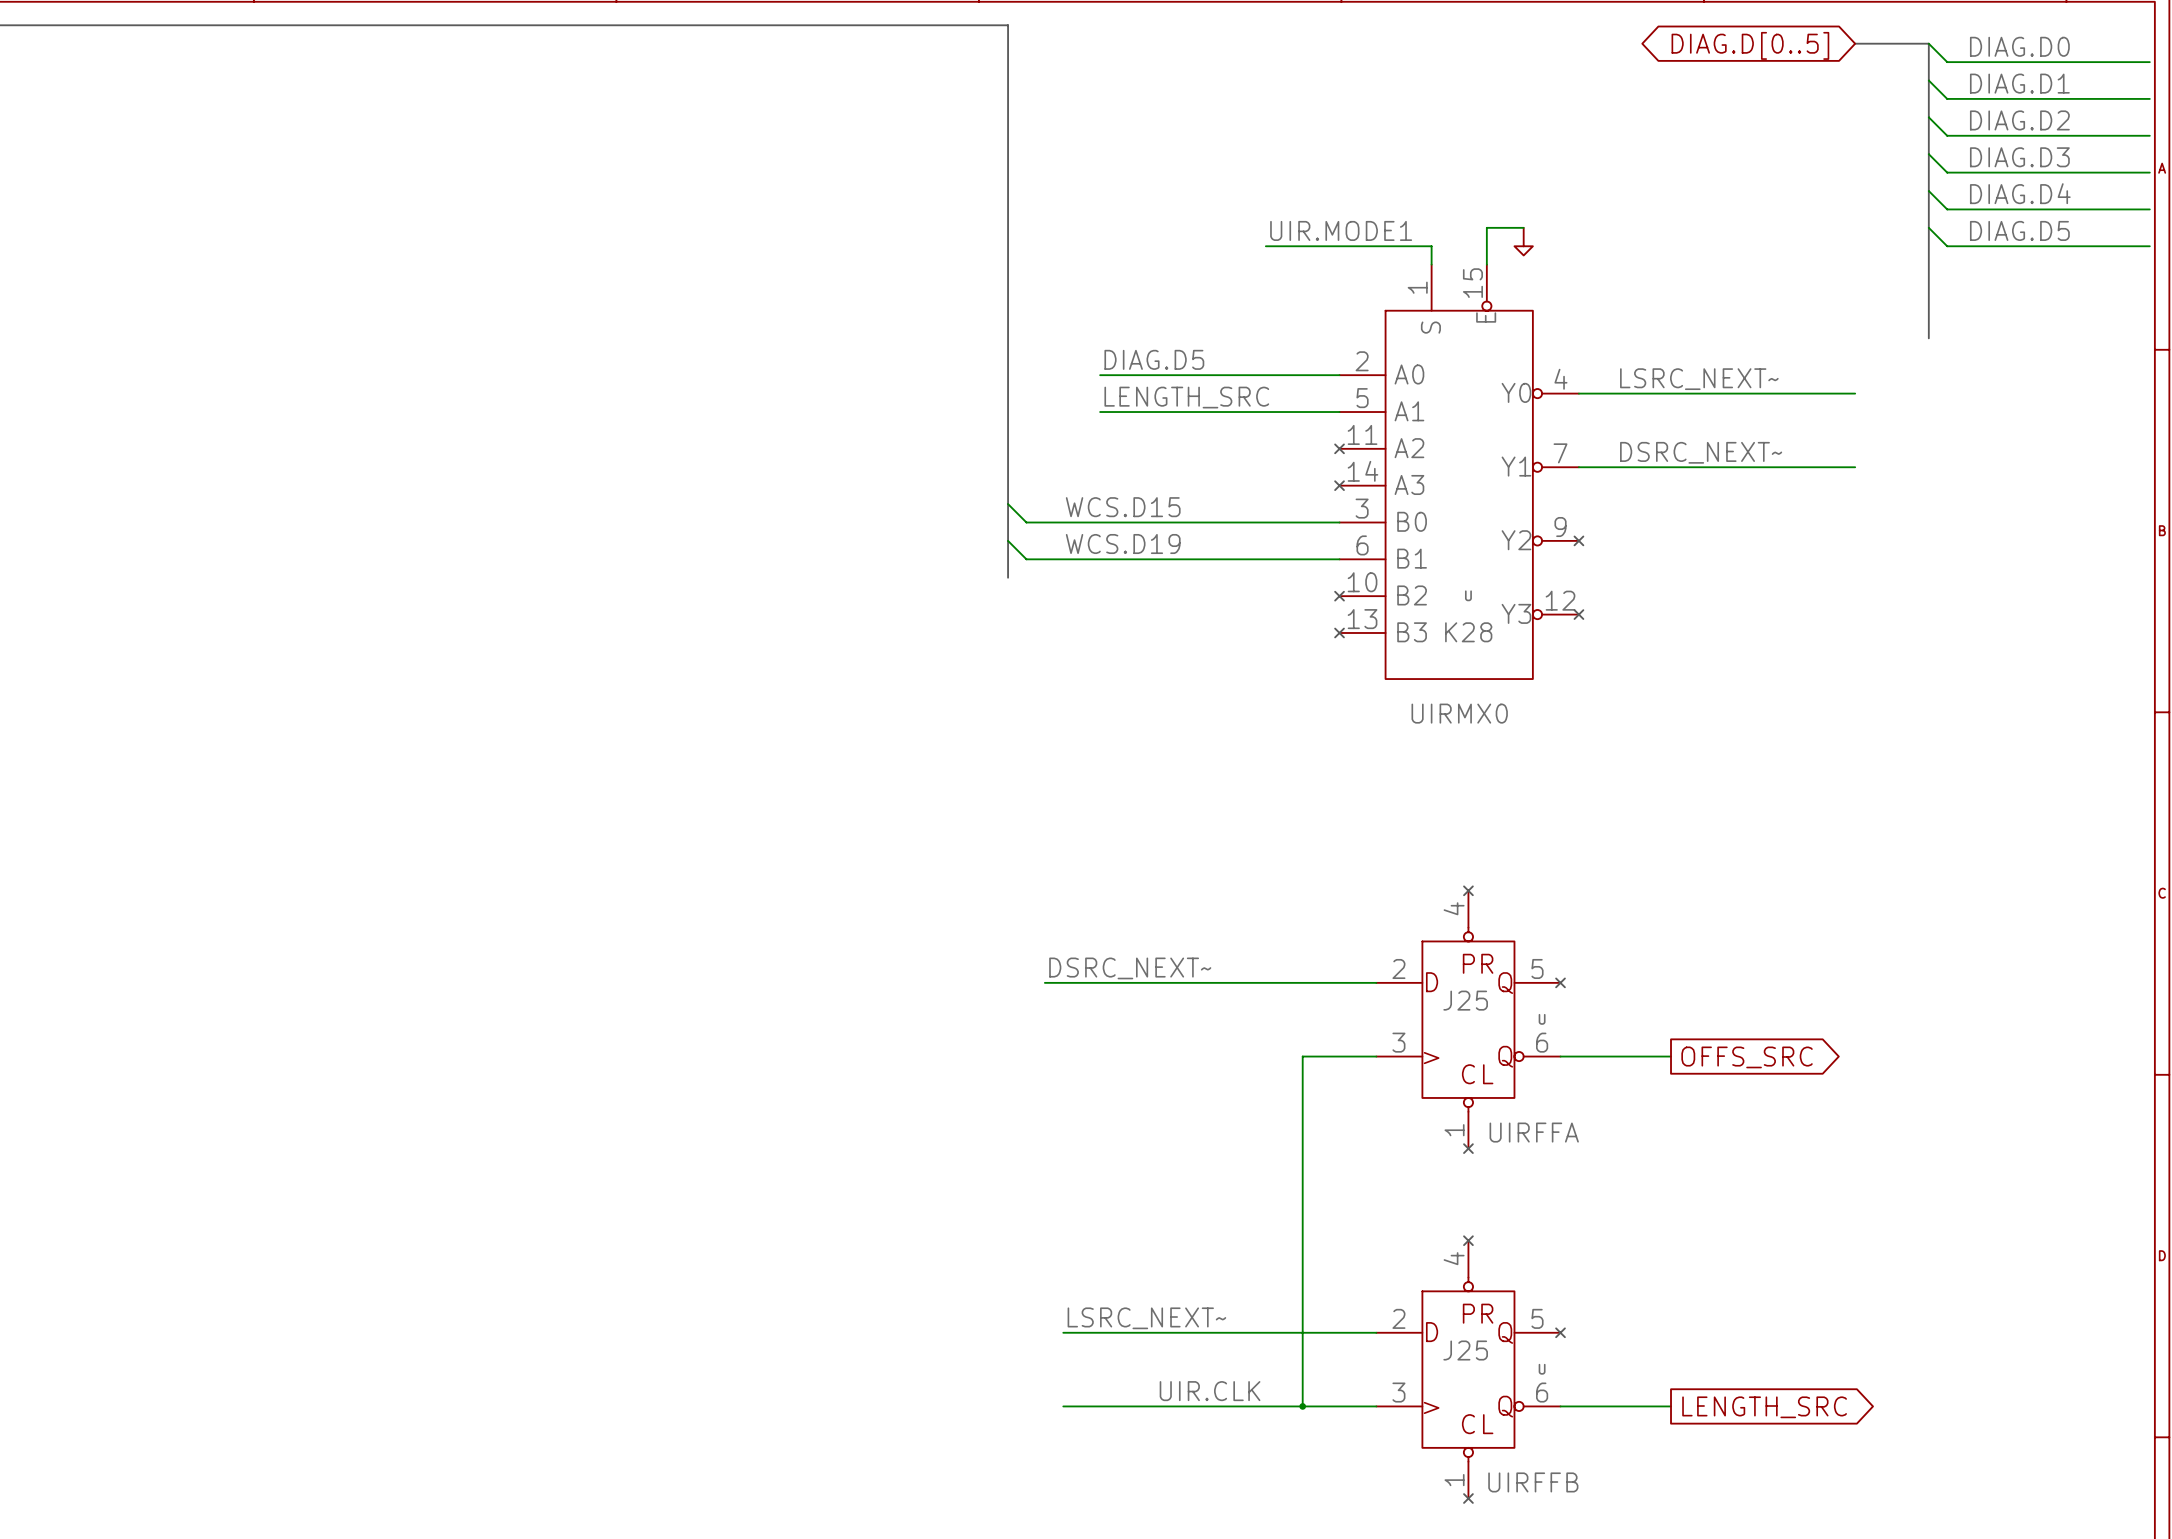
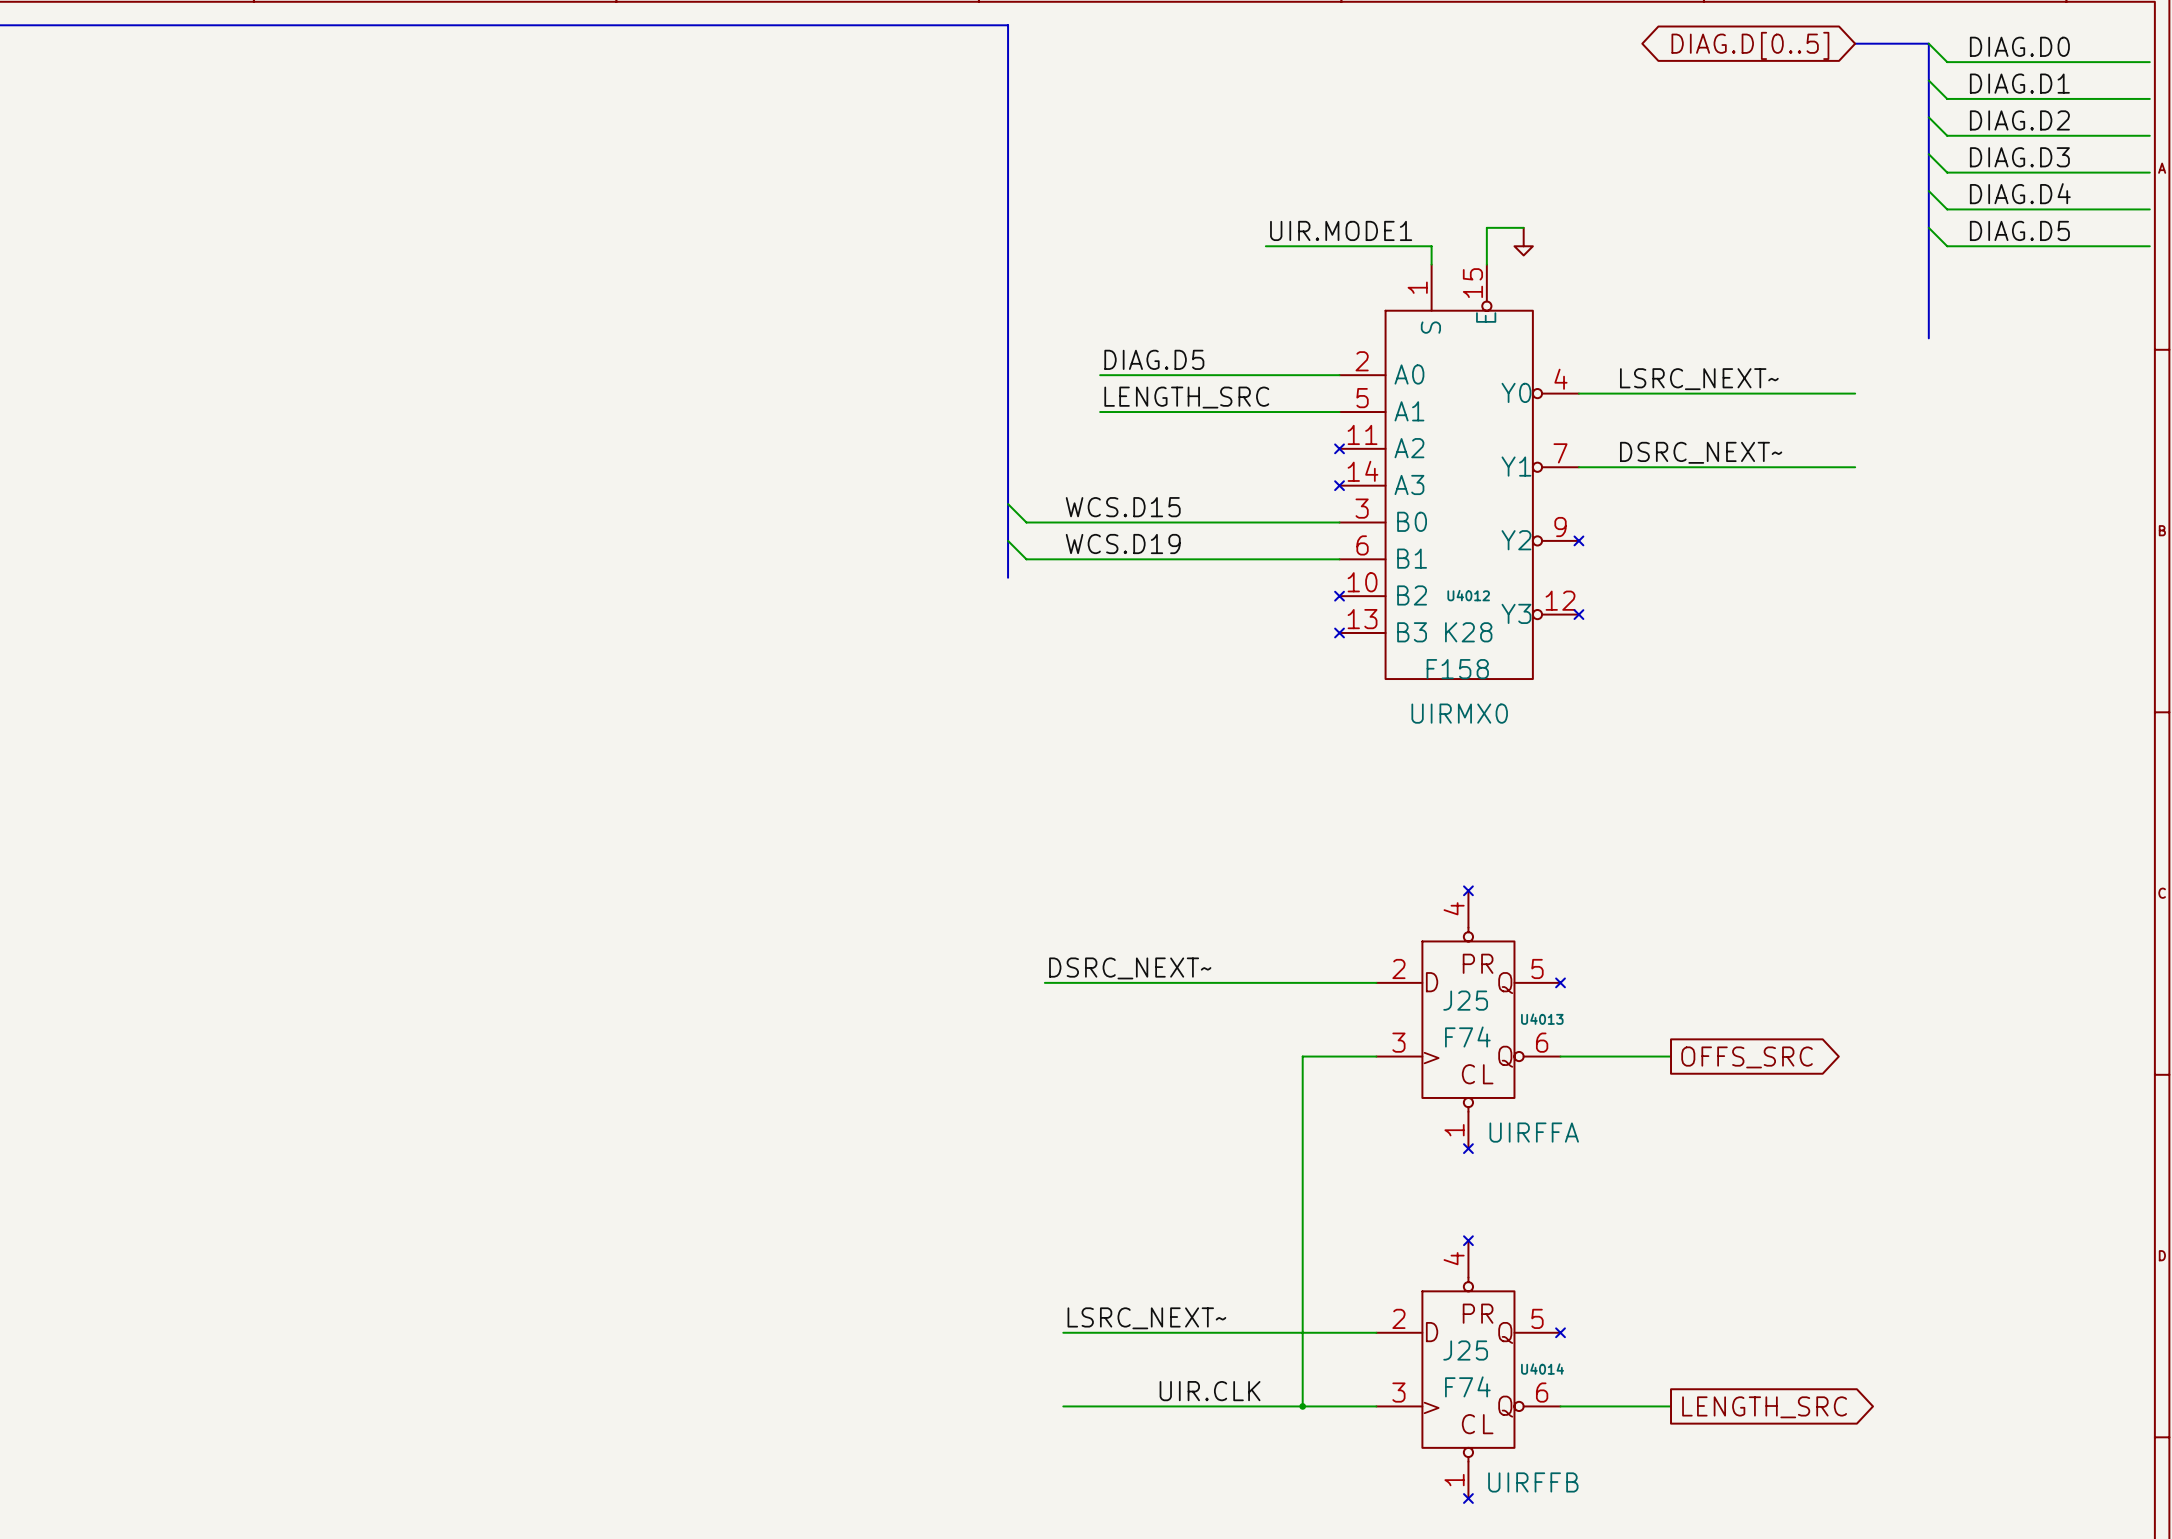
U name: U (1468, 595) -> U4012 (1468, 595)
U value: none -> F158 (1457, 669)
U name: U (1542, 1019) -> U4013 (1542, 1019)
U value: none -> F74 (1467, 1037)
U name: U (1542, 1369) -> U4014 (1542, 1369)
U value: none -> F74 (1467, 1386)

